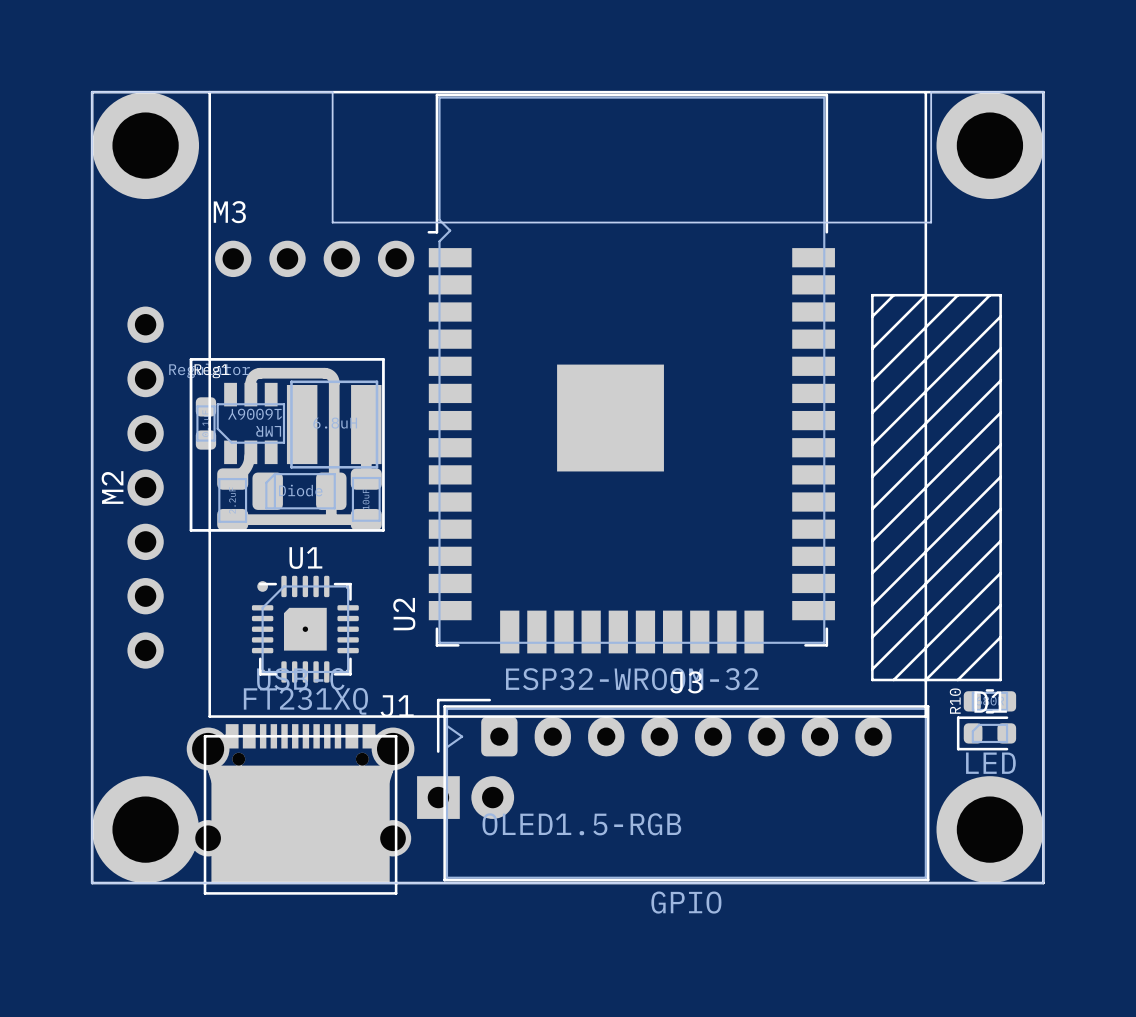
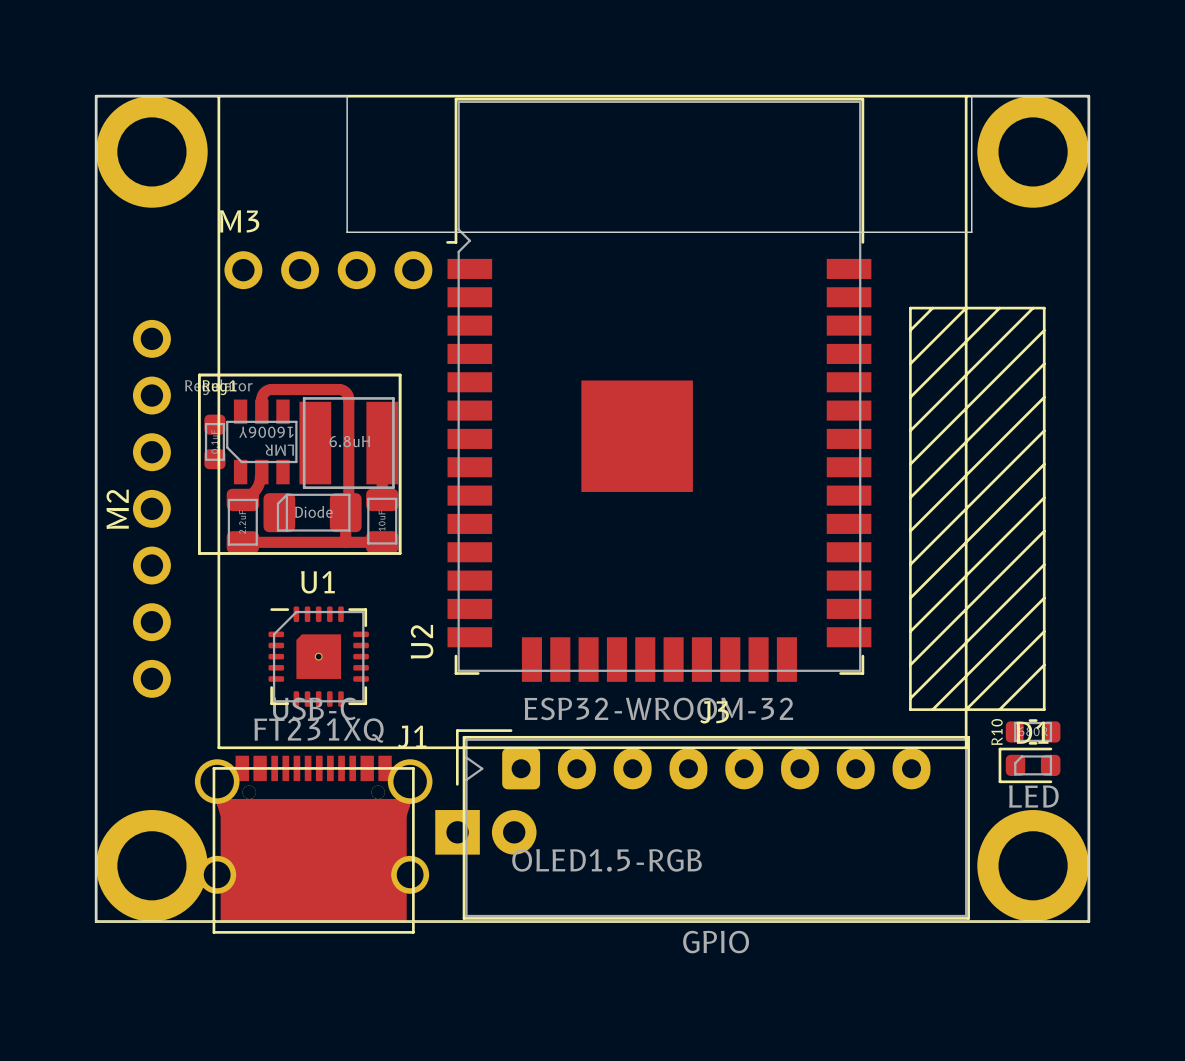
U1 footprint: [251, 575, 359, 683] -> [268, 606, 369, 707]

